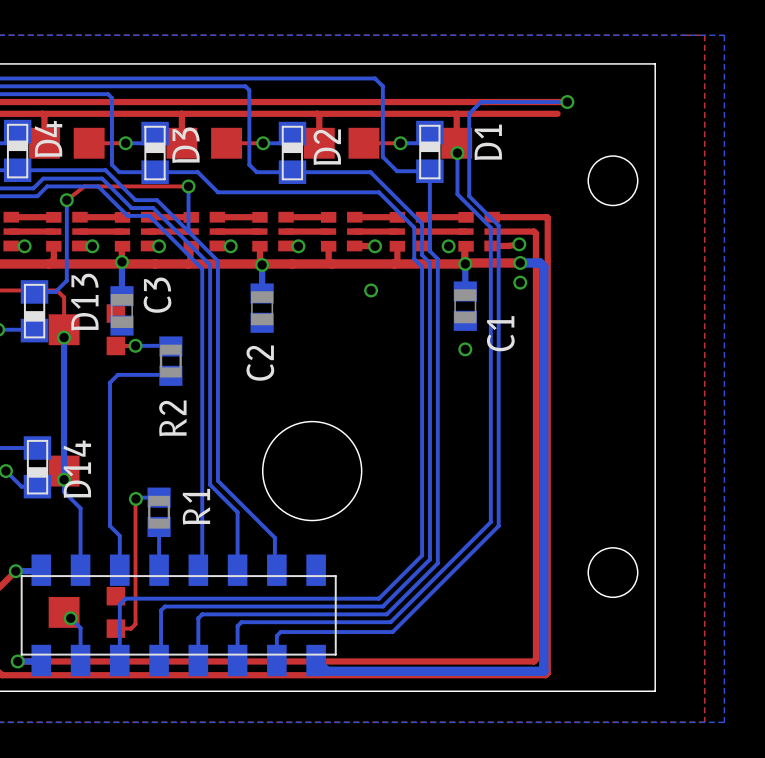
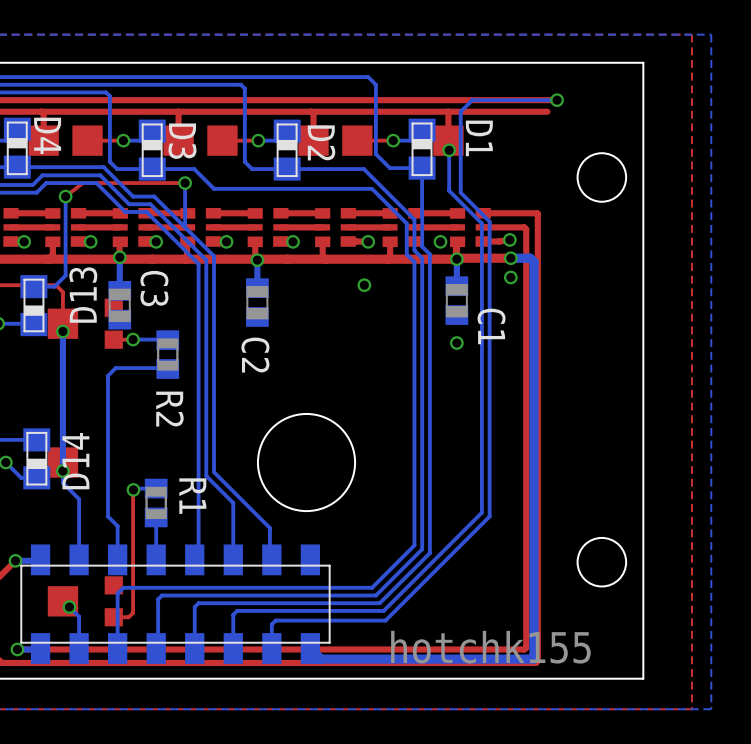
D4 name rotation: 0° (48, 139) -> 180° (47, 135)
D1 name rotation: 0° (488, 142) -> 180° (479, 138)
D3 name rotation: 0° (185, 145) -> 180° (182, 141)
D2 name rotation: 0° (327, 147) -> 180° (321, 142)
C3 name rotation: 0° (157, 295) -> 180° (154, 288)
C1 name rotation: 0° (500, 333) -> 180° (491, 326)
C2 name rotation: 0° (260, 363) -> 180° (255, 355)
R2 name rotation: 0° (172, 418) -> 180° (169, 409)
R1 name rotation: 0° (196, 506) -> 180° (192, 496)
text: none -> hotchk155 (490, 647)

